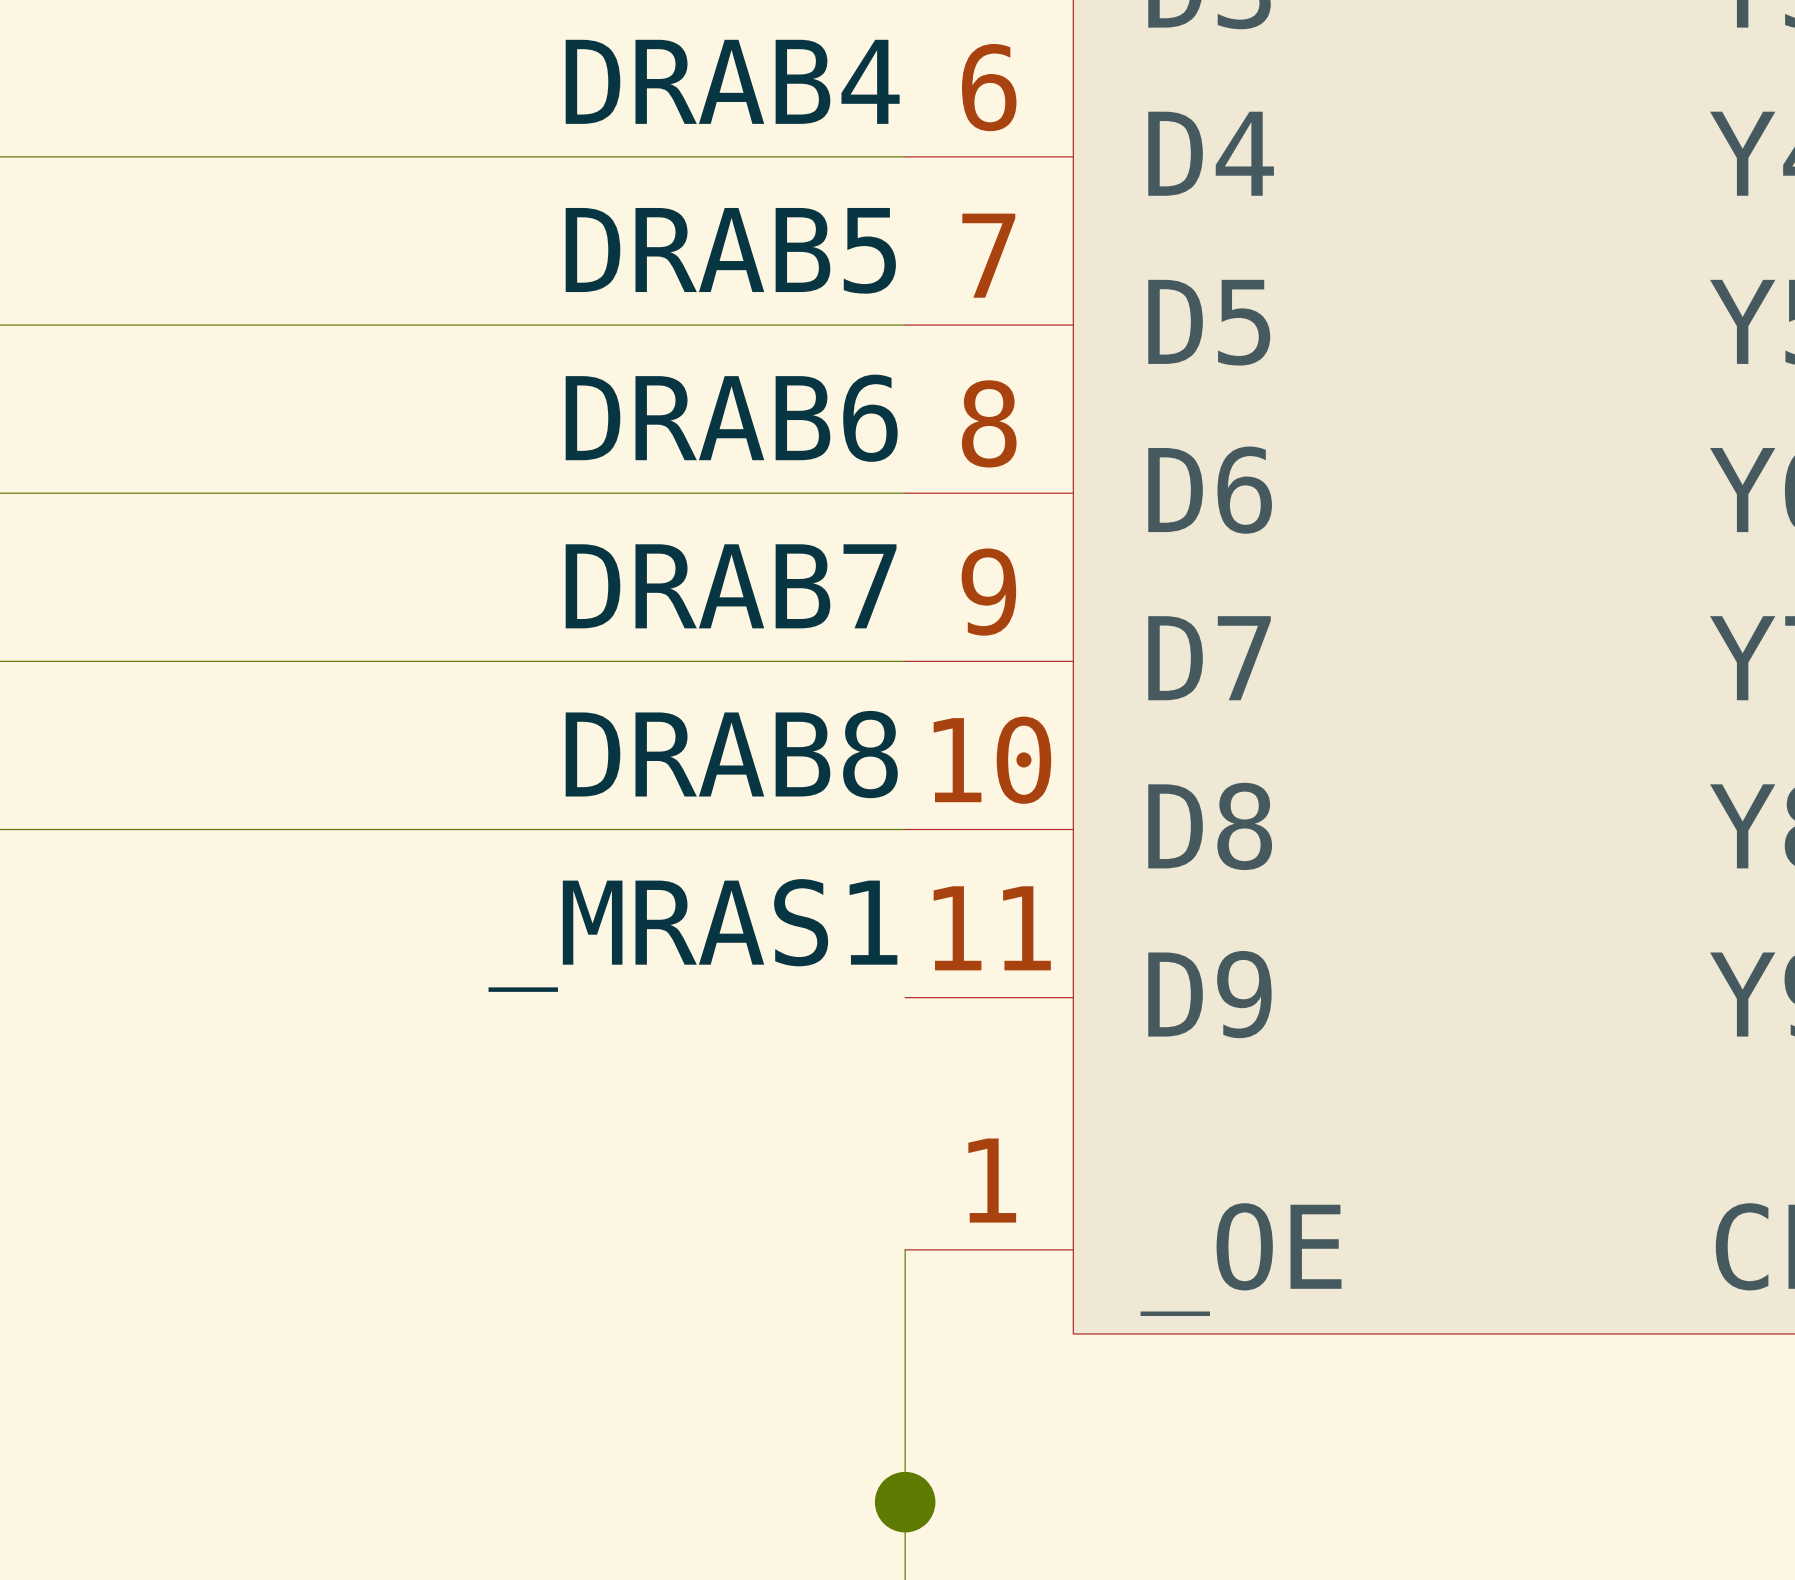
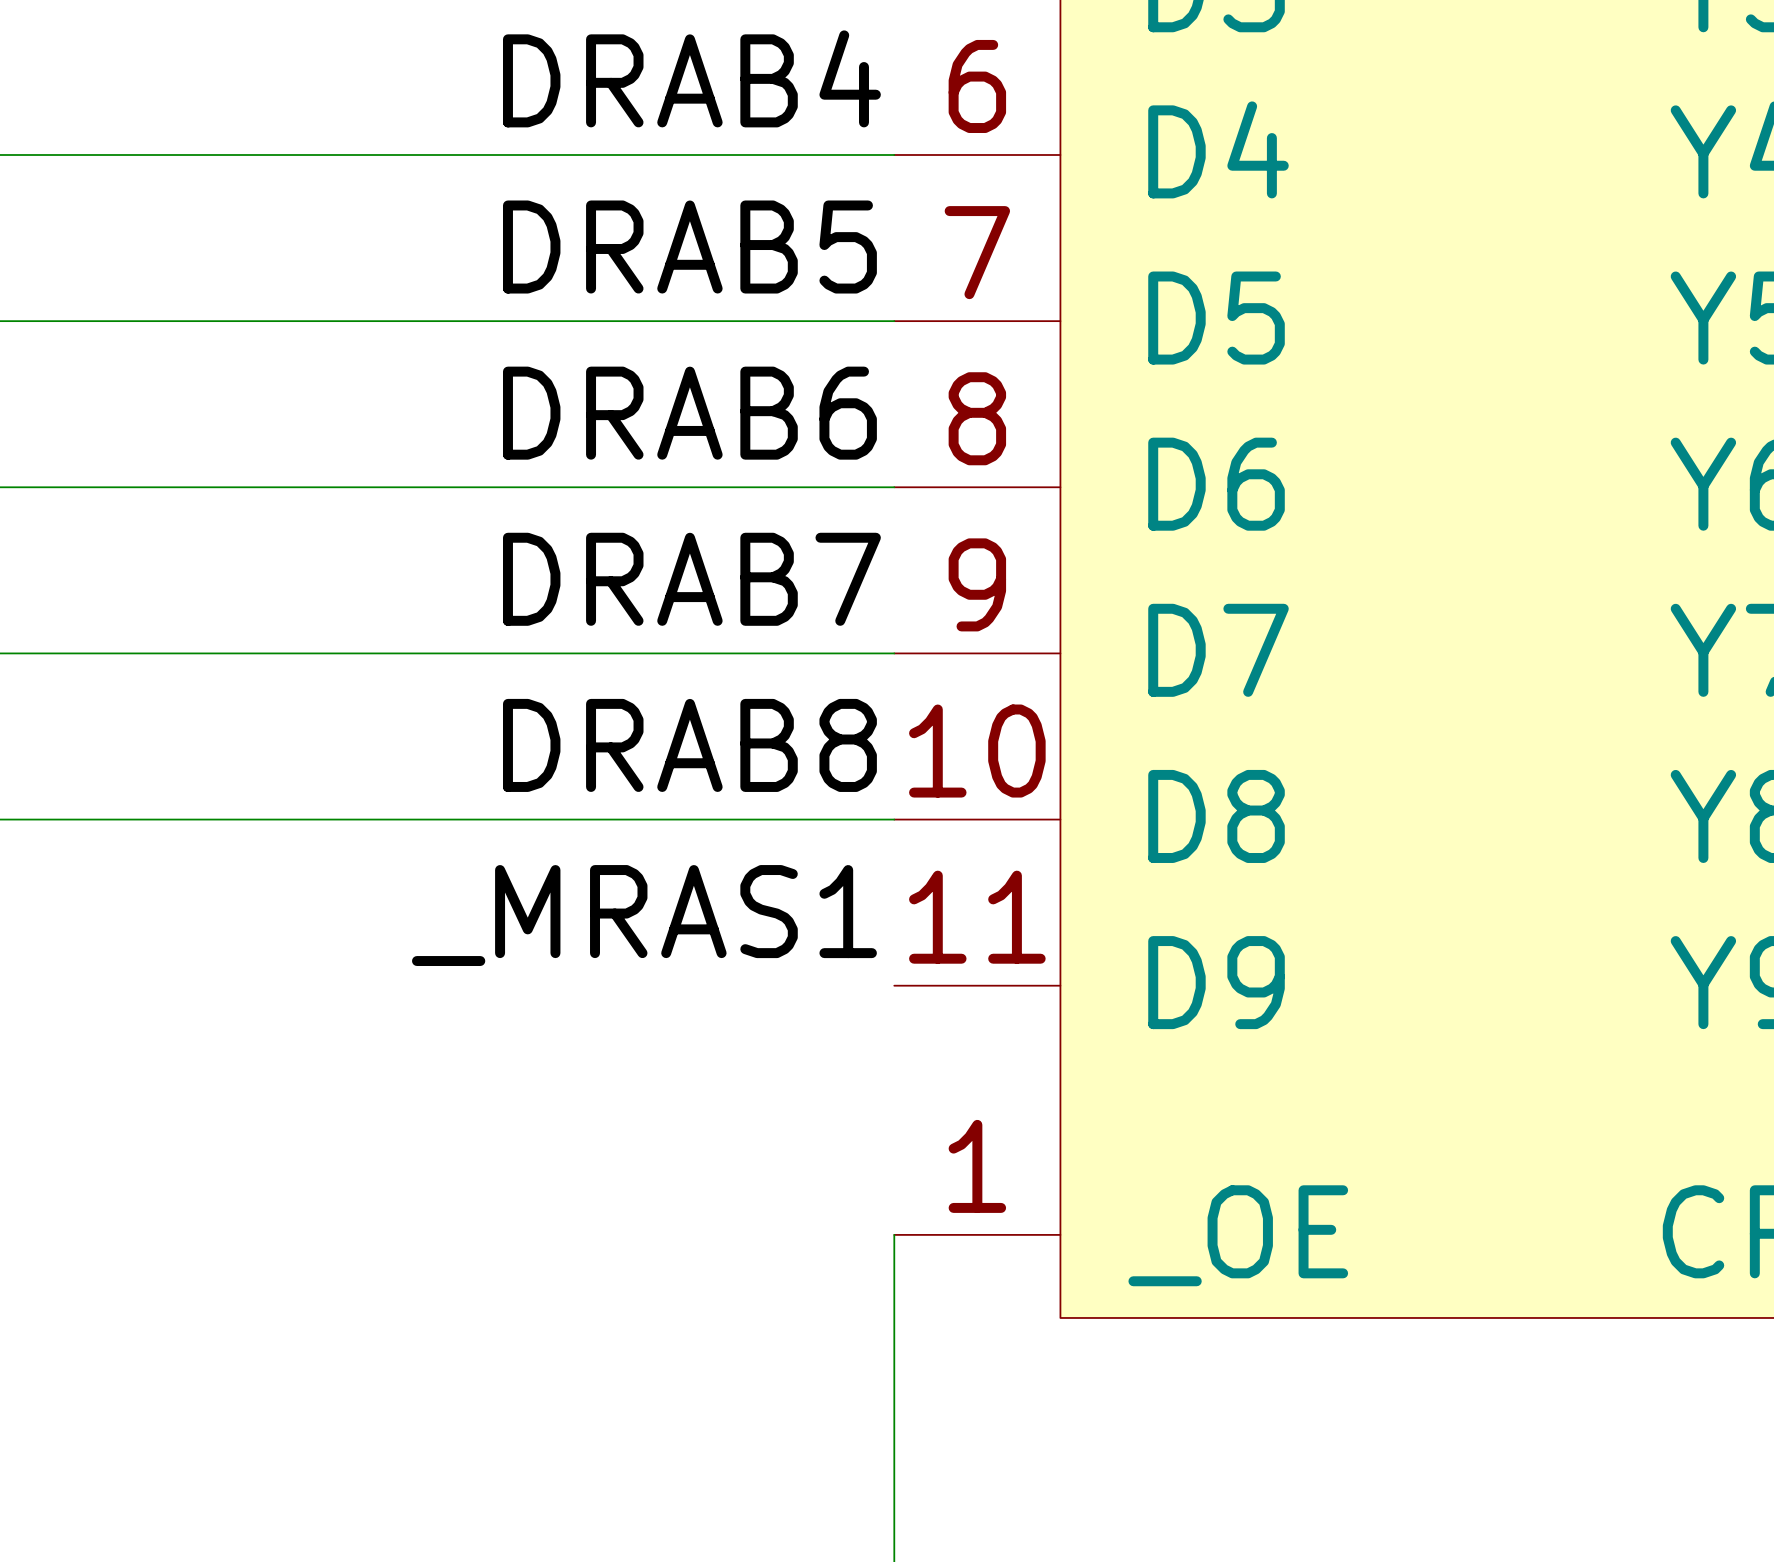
junction: (905, 1502) -> none

